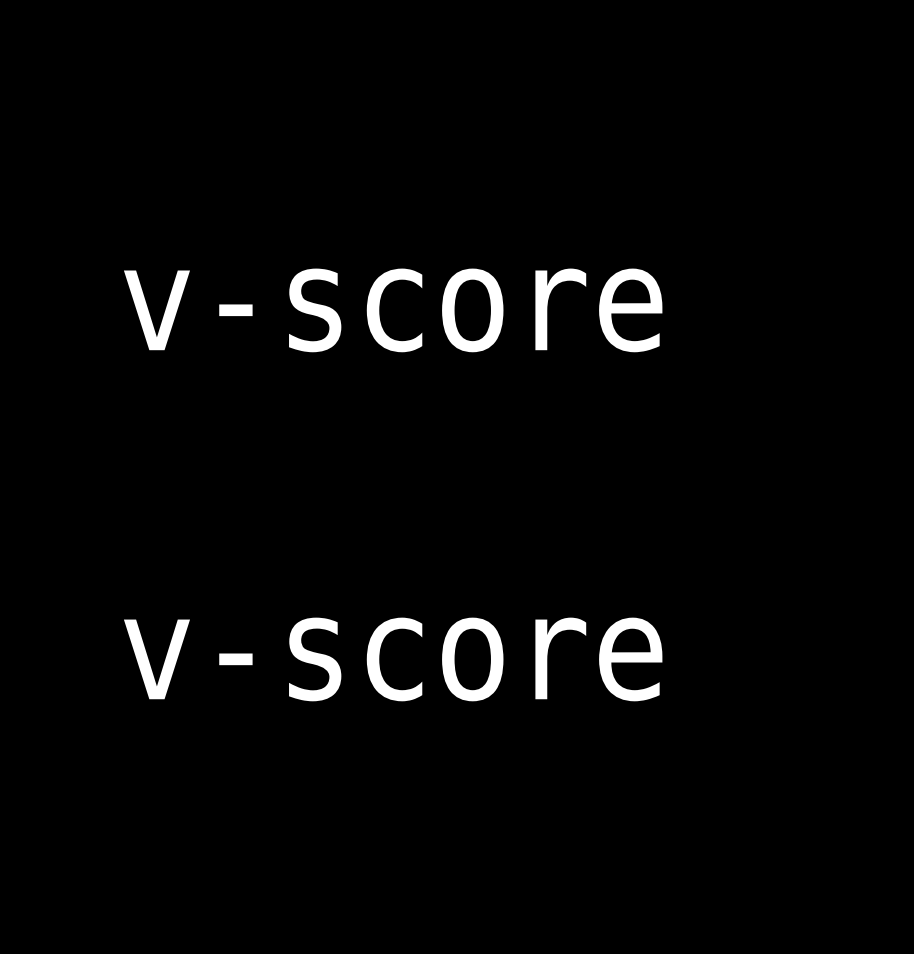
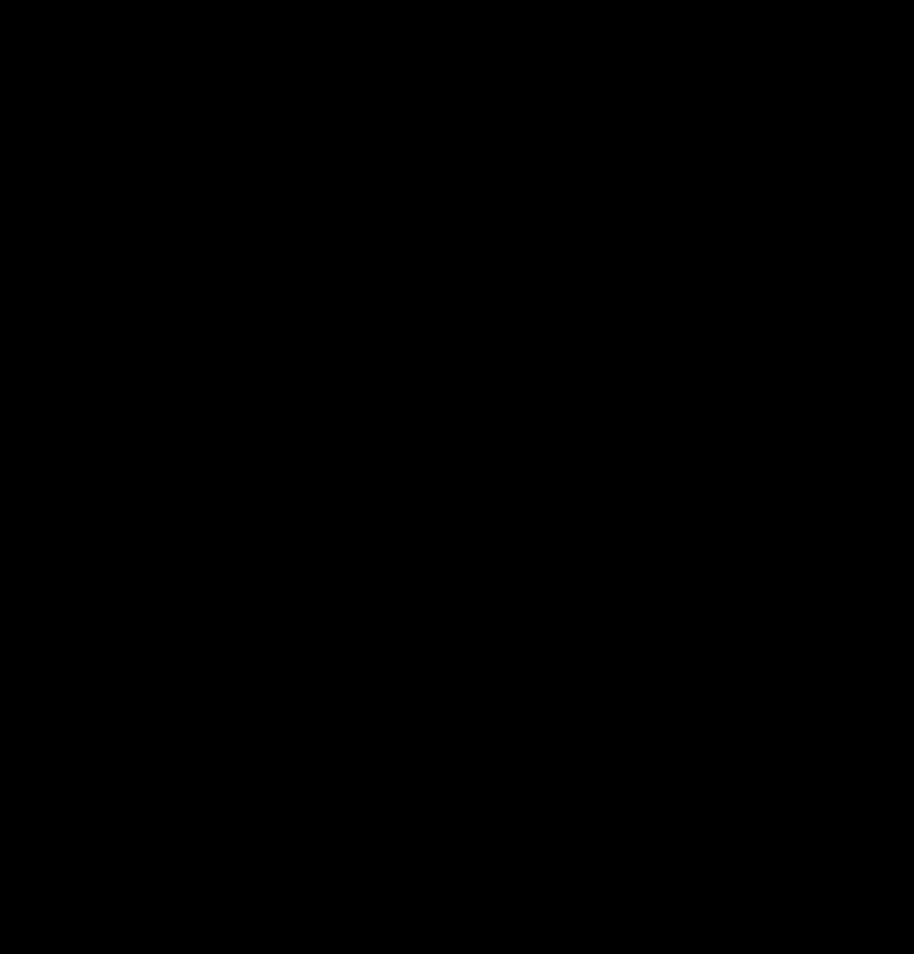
text: v-score (393, 310) -> none
text: v-score (393, 659) -> none

